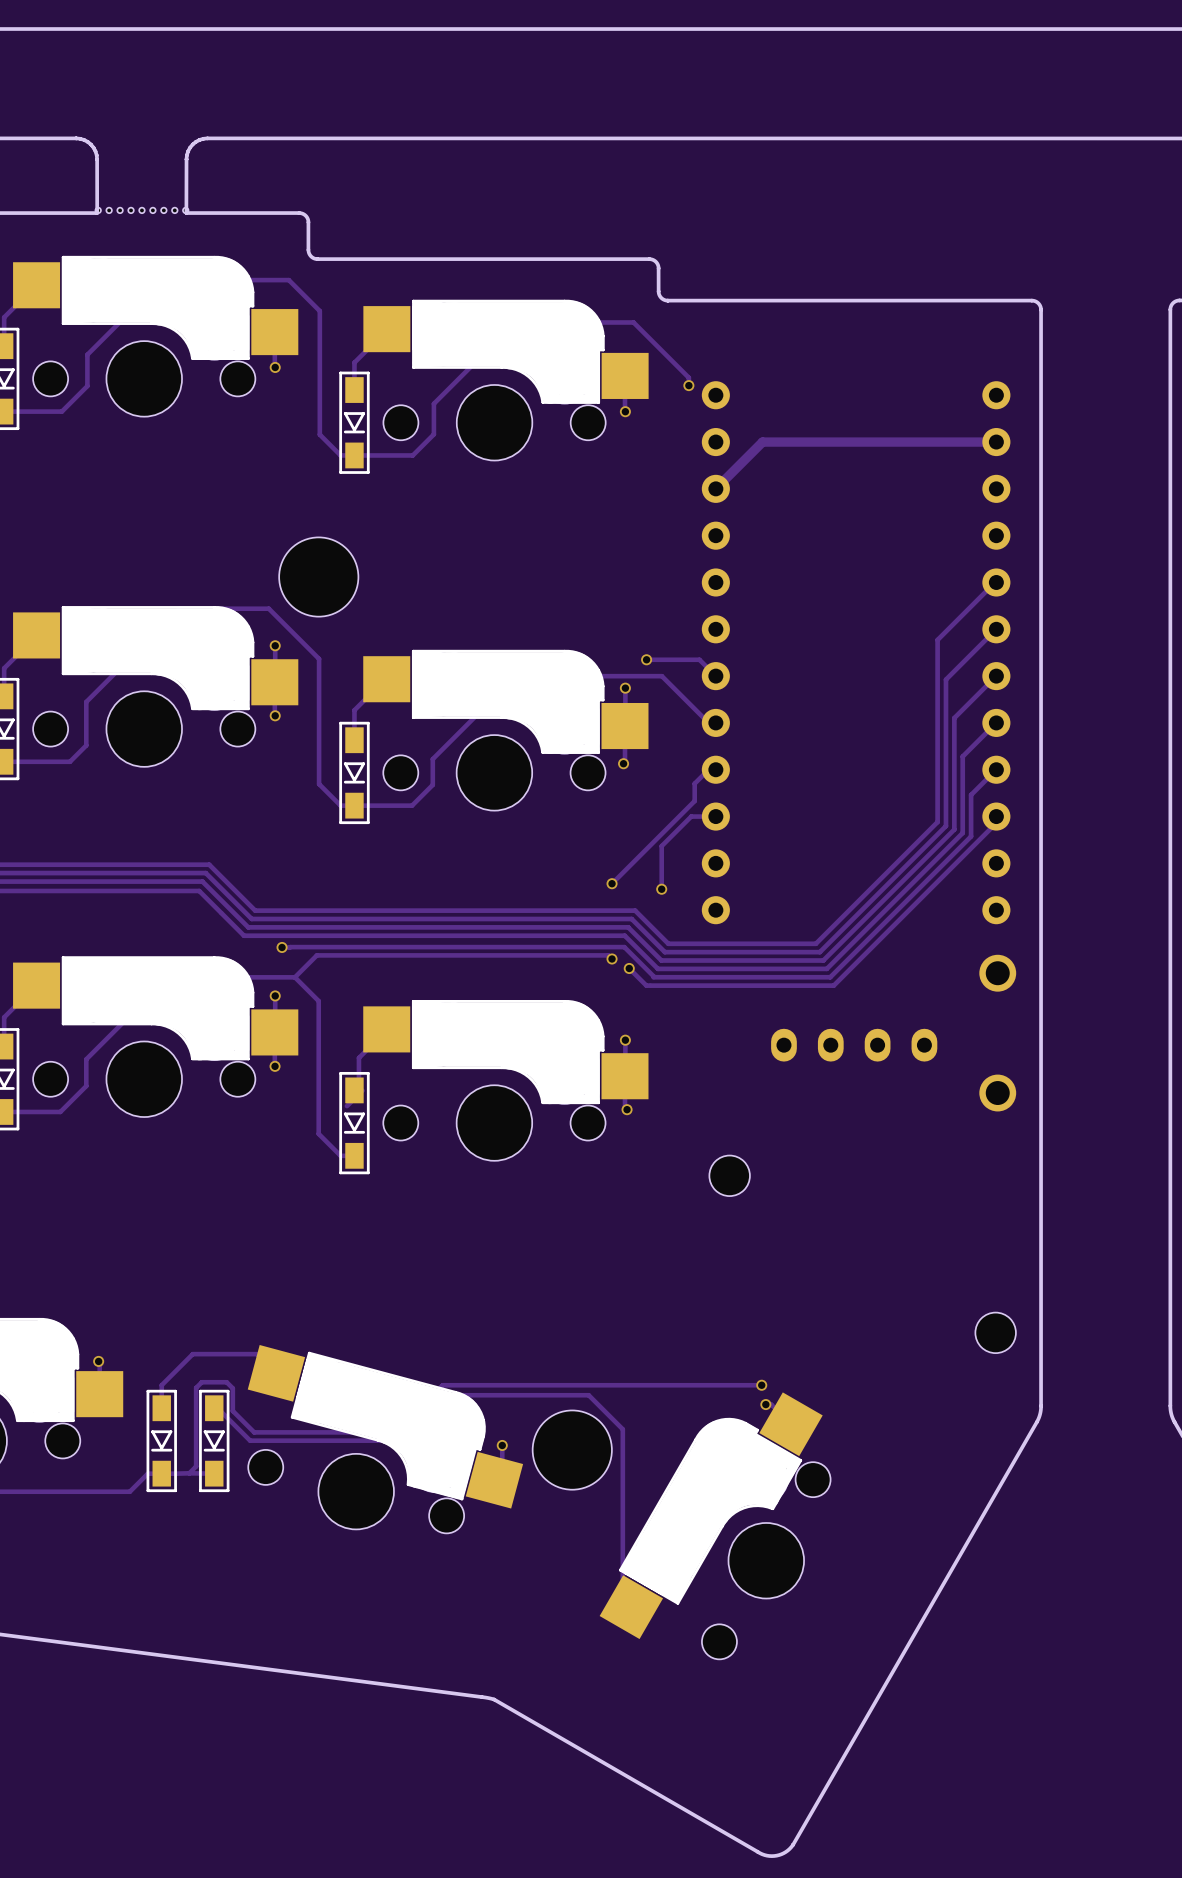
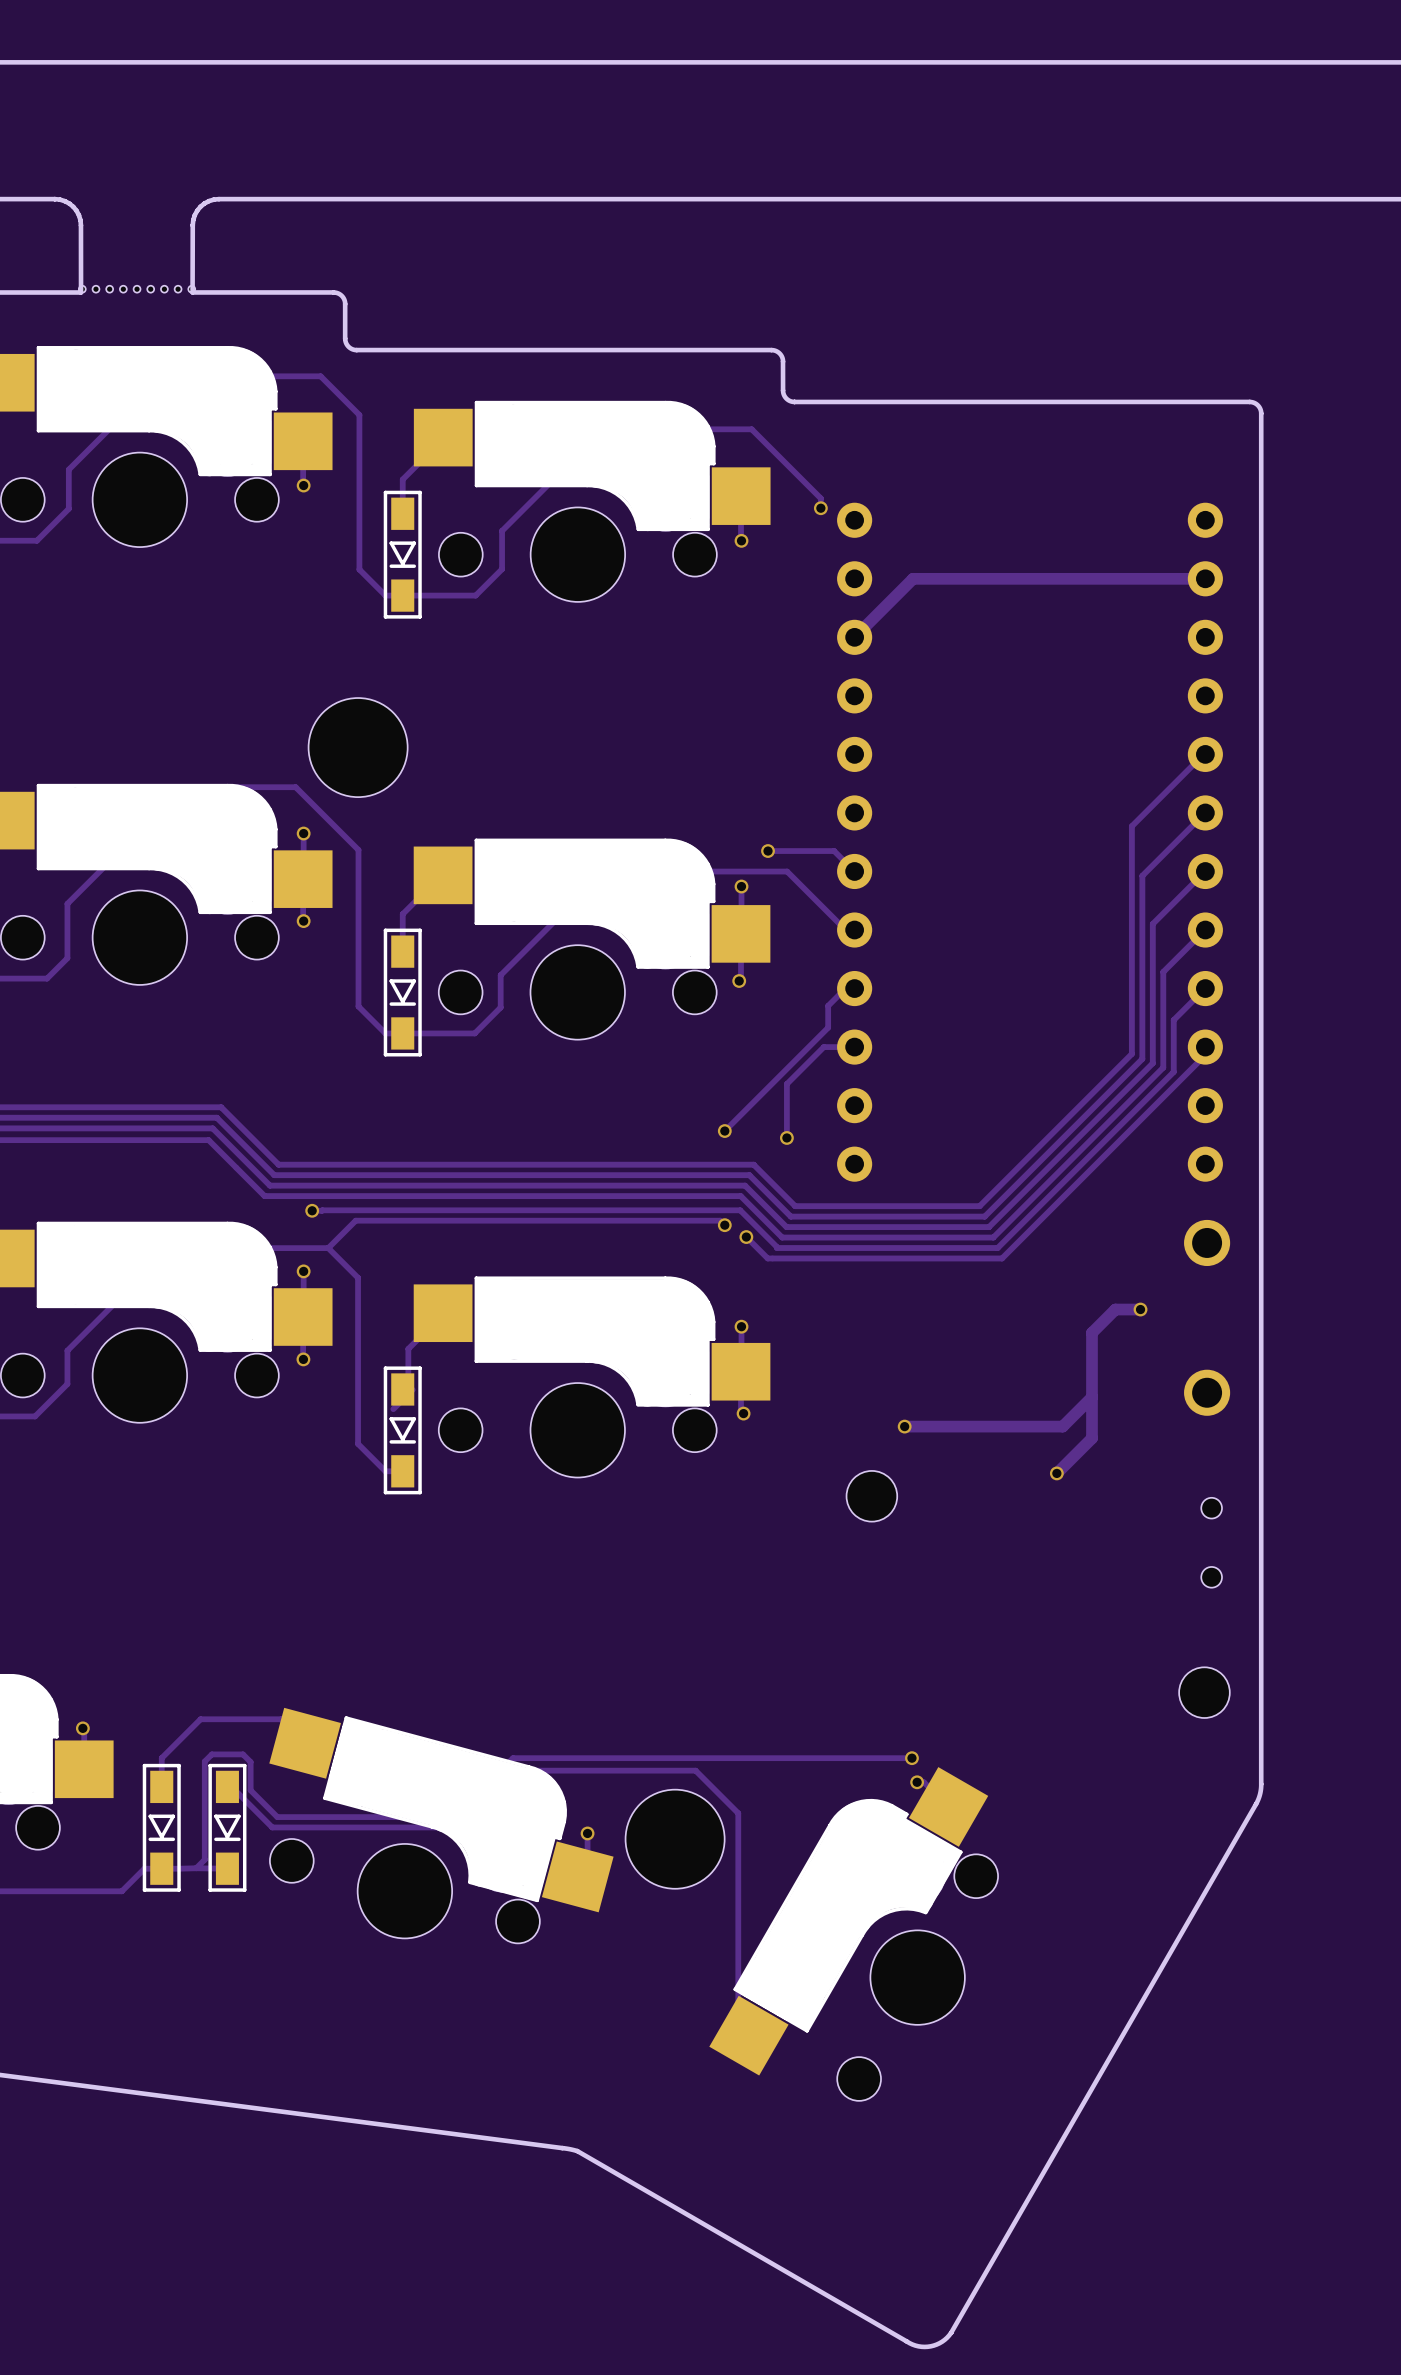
track: none -> (1140, 1309) (1115, 1309) (1091, 1332) (1091, 1438) (1056, 1473)
via: none -> (1140, 1309)
part: (854, 1045) -> none
track: none -> (1091, 1397) (1062, 1426) (904, 1426)
via: none -> (904, 1426)
via: none -> (1056, 1473)
part: none -> (1211, 1542)

